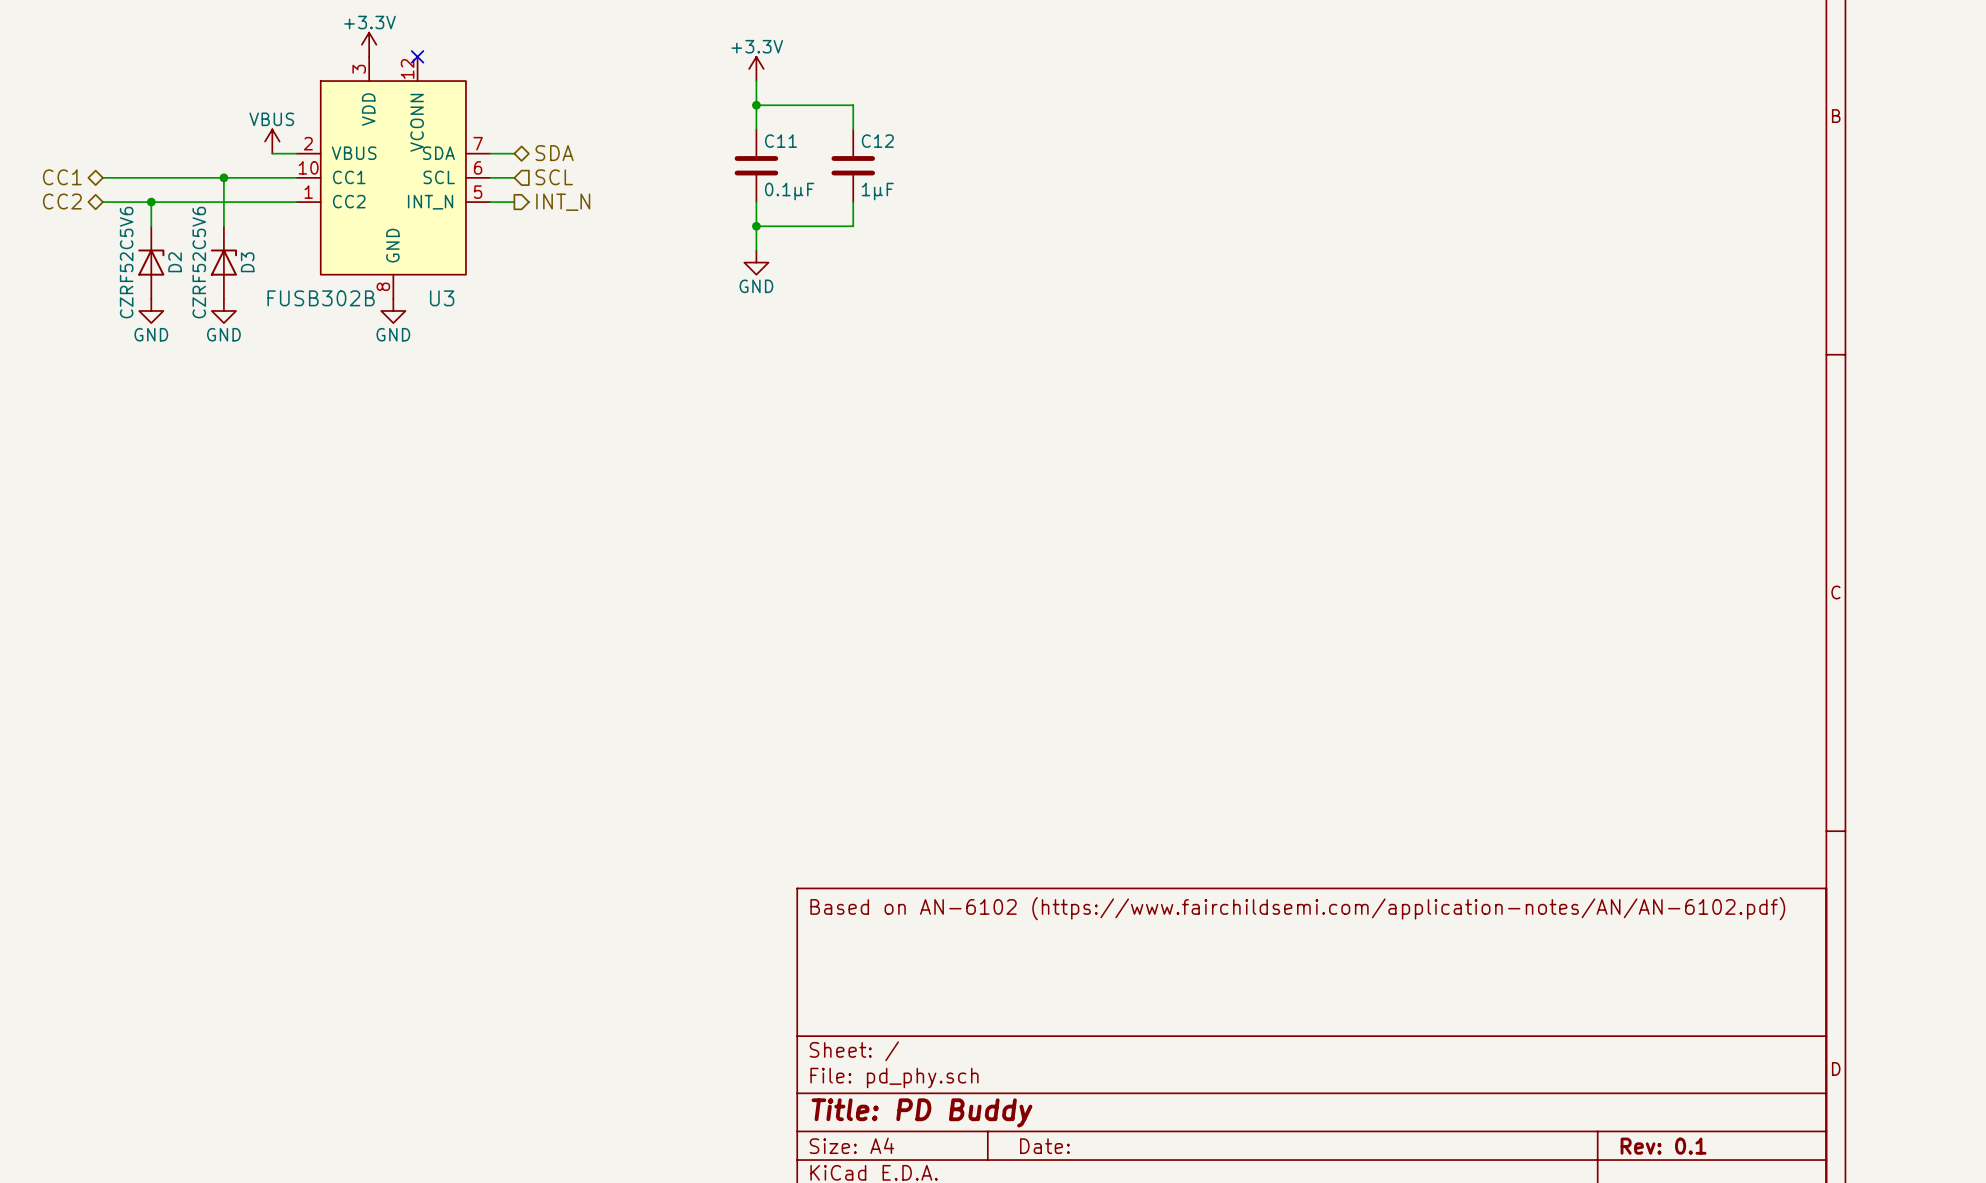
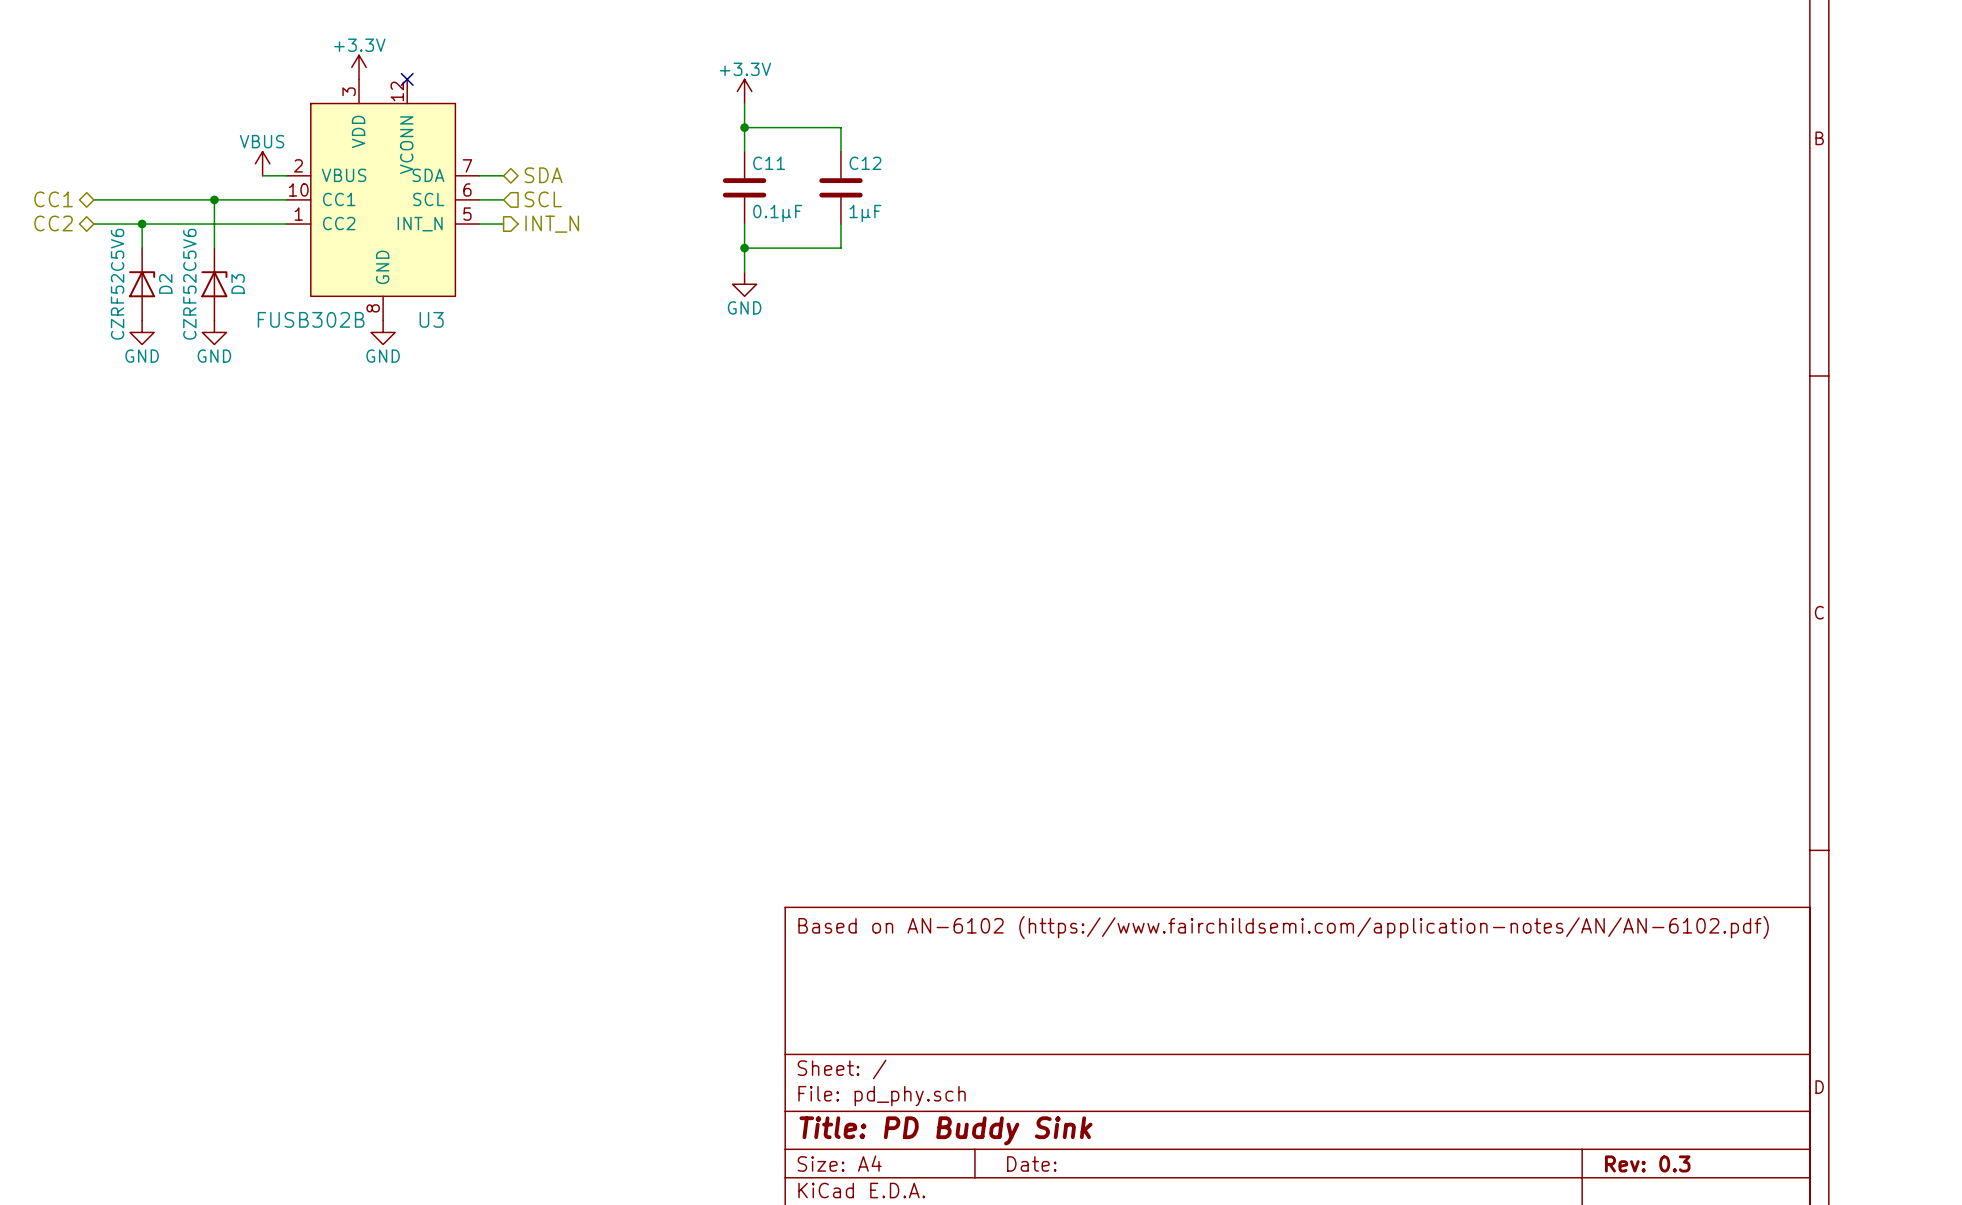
title block: Title: PD Buddy (921, 1112) -> Title: PD Buddy Sink (946, 1130)
title block: Rev: 0.1 (1663, 1146) -> Rev: 0.3 (1647, 1163)

